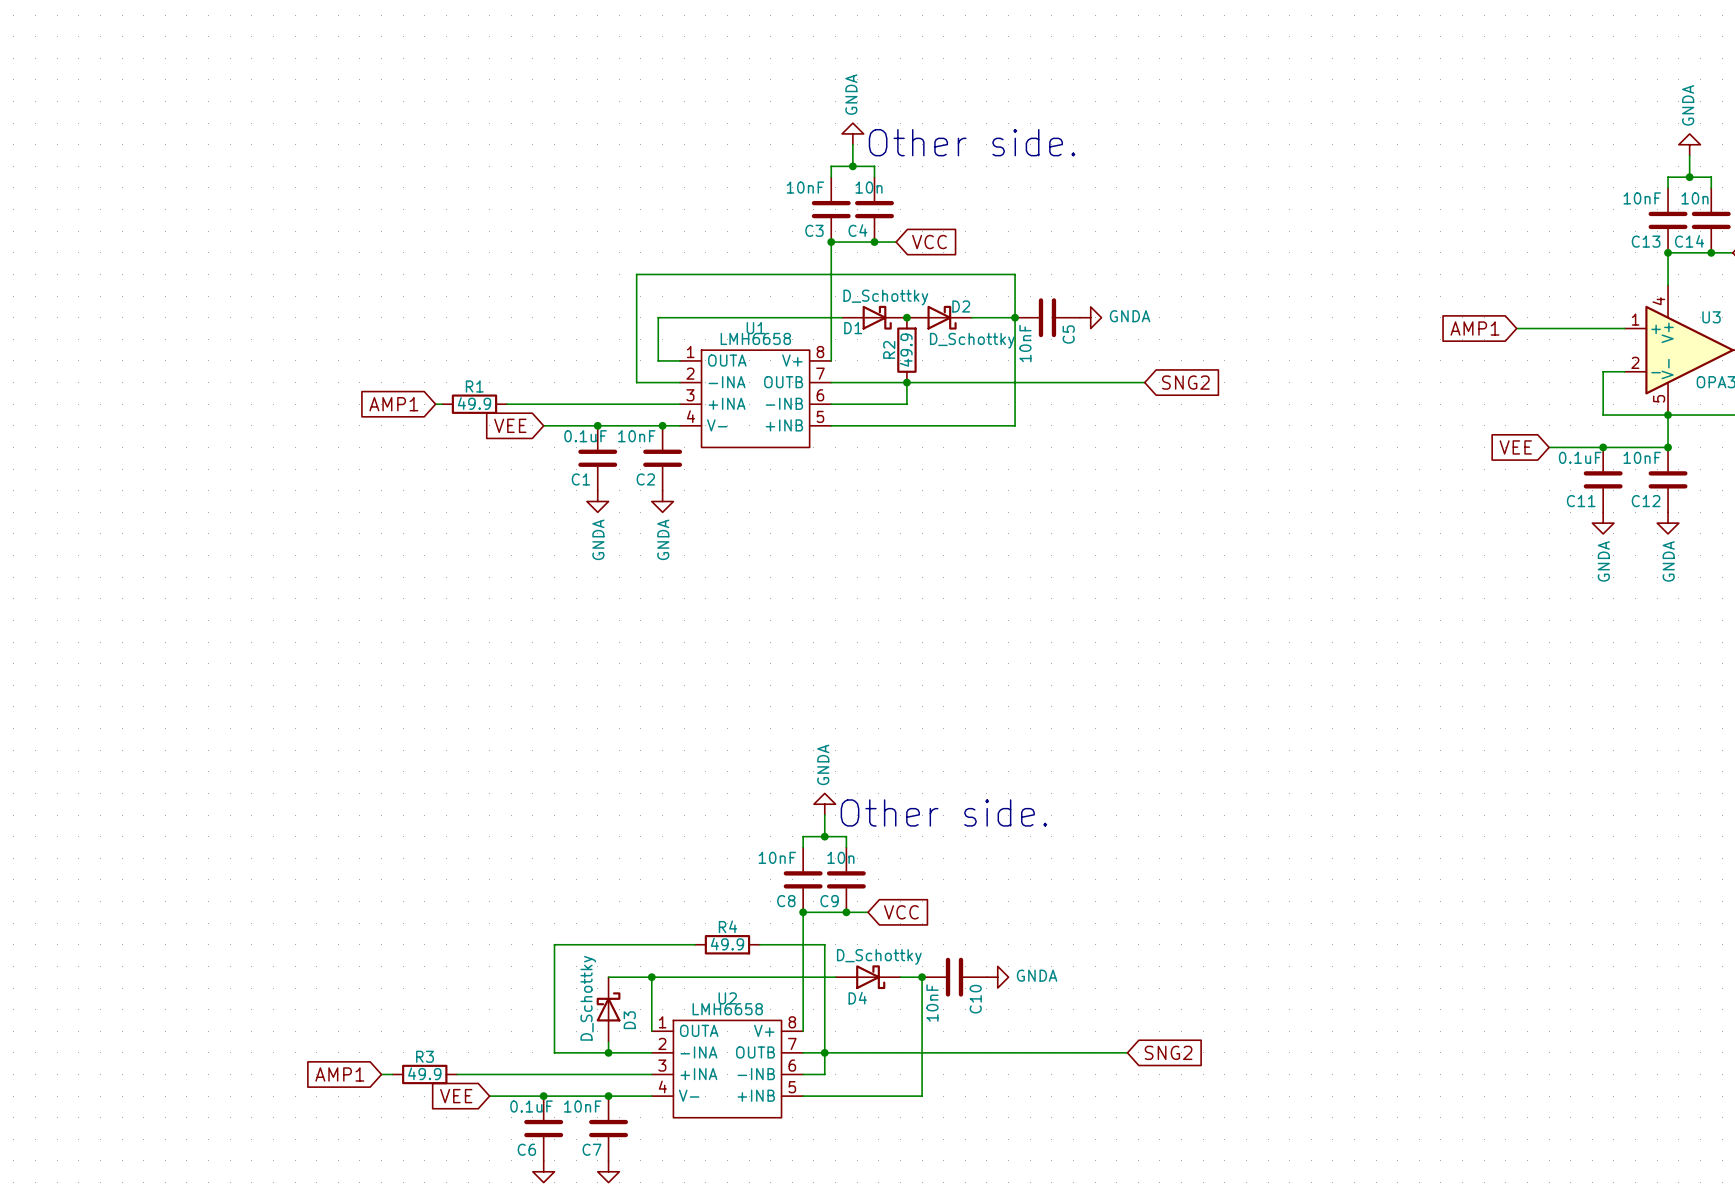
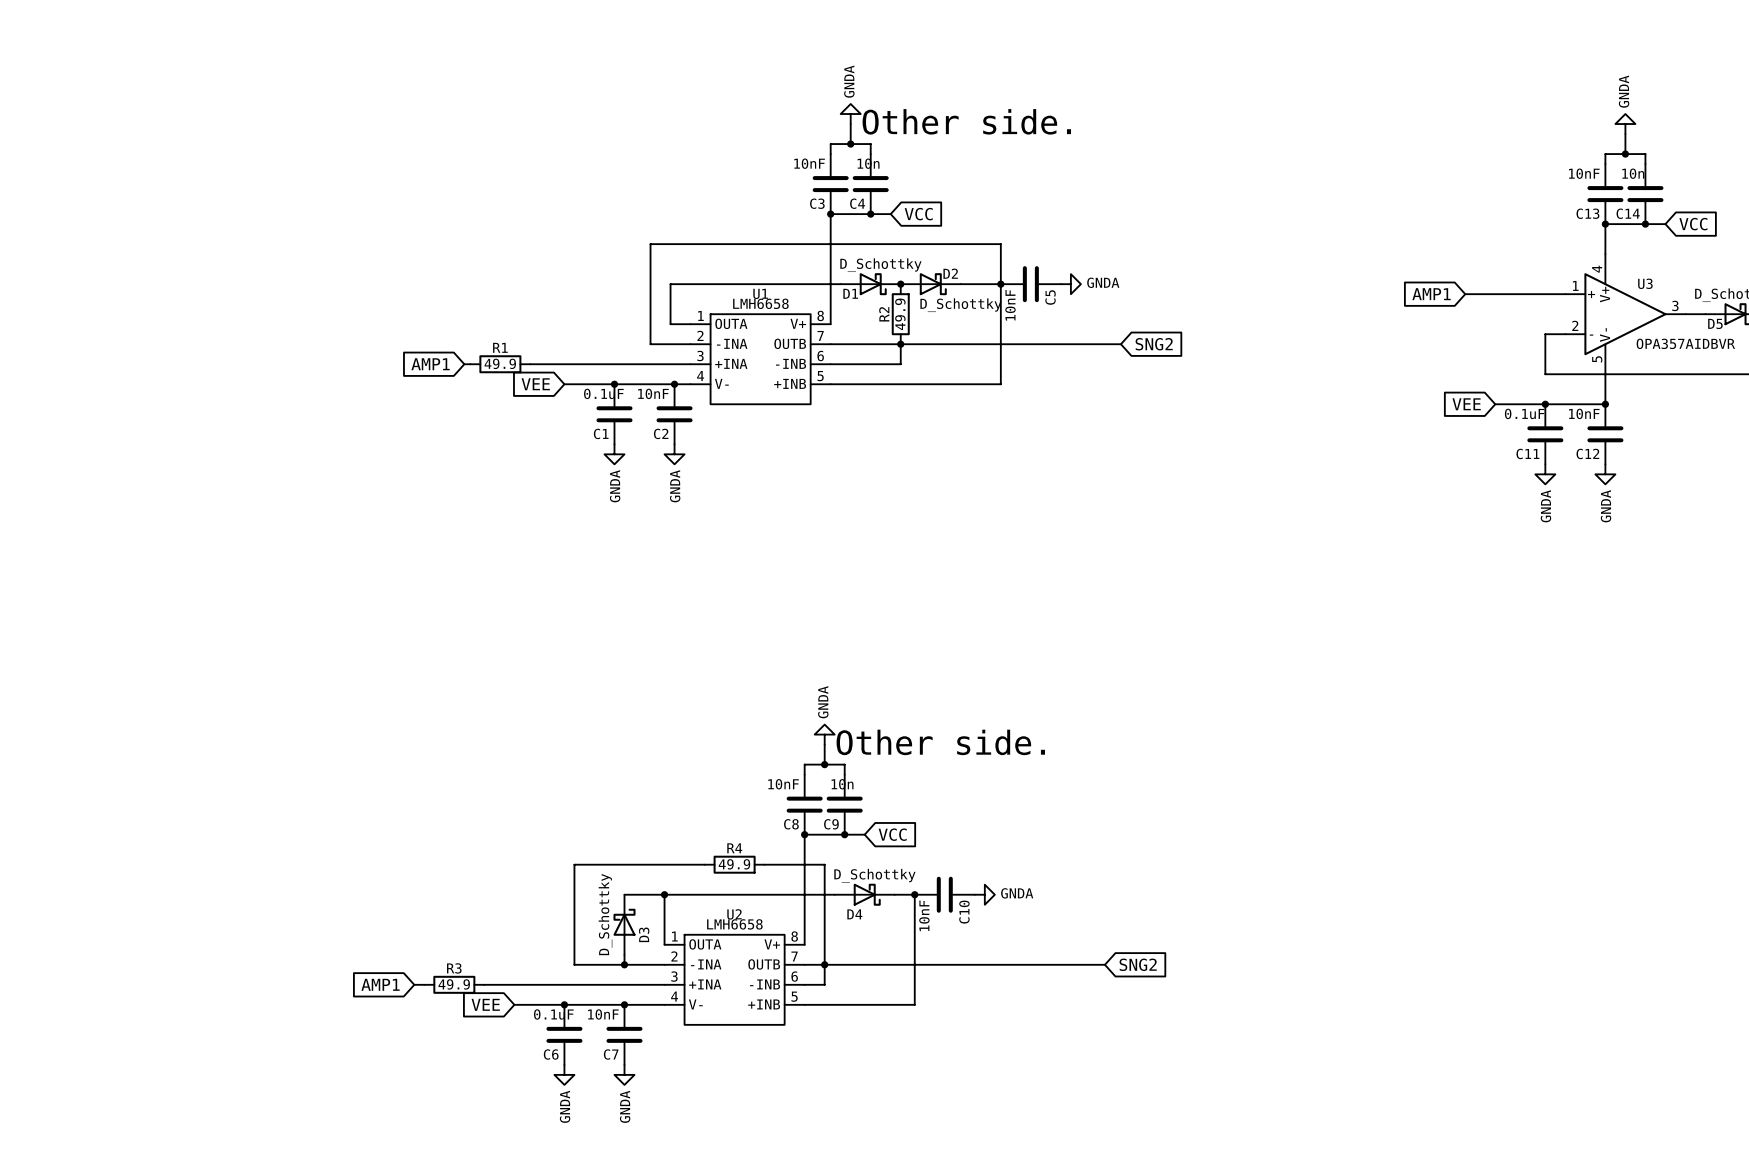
junction: (1668, 415) -> none

